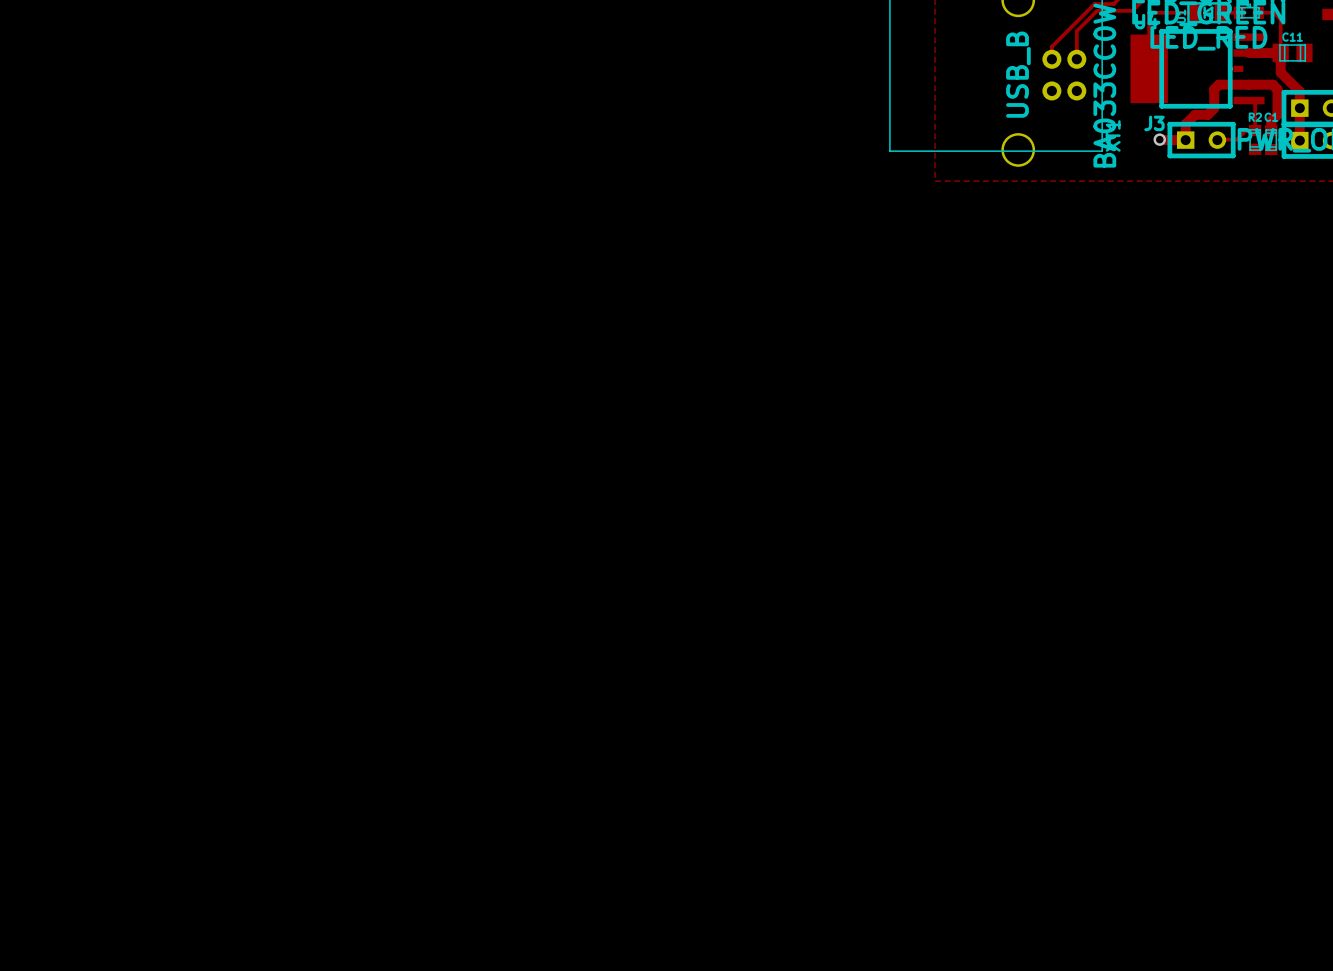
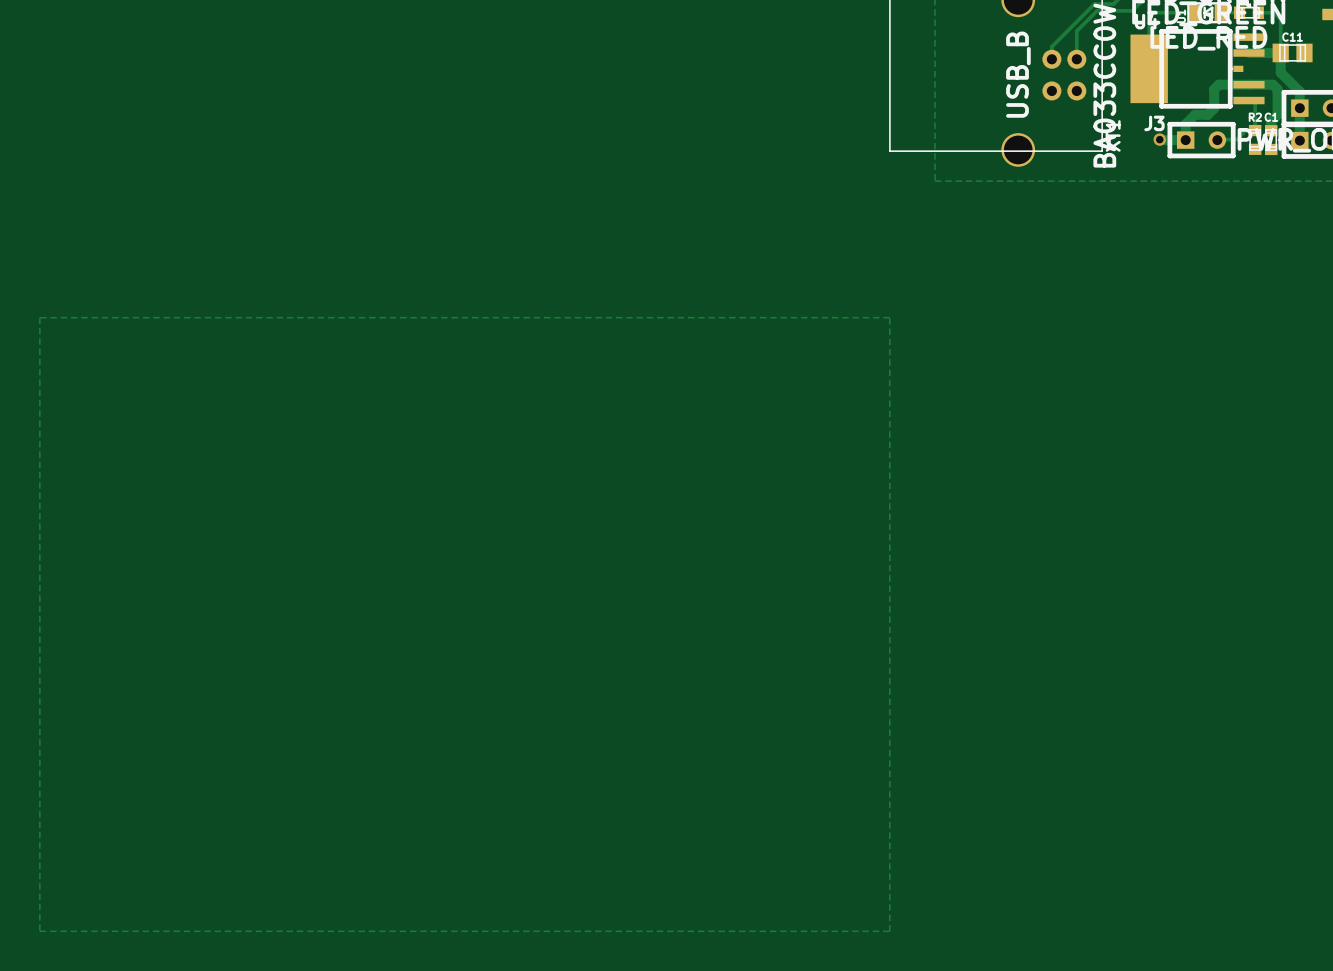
zone outline: none -> (39, 317) (889, 317) (889, 931) (39, 931) (39, 317)

